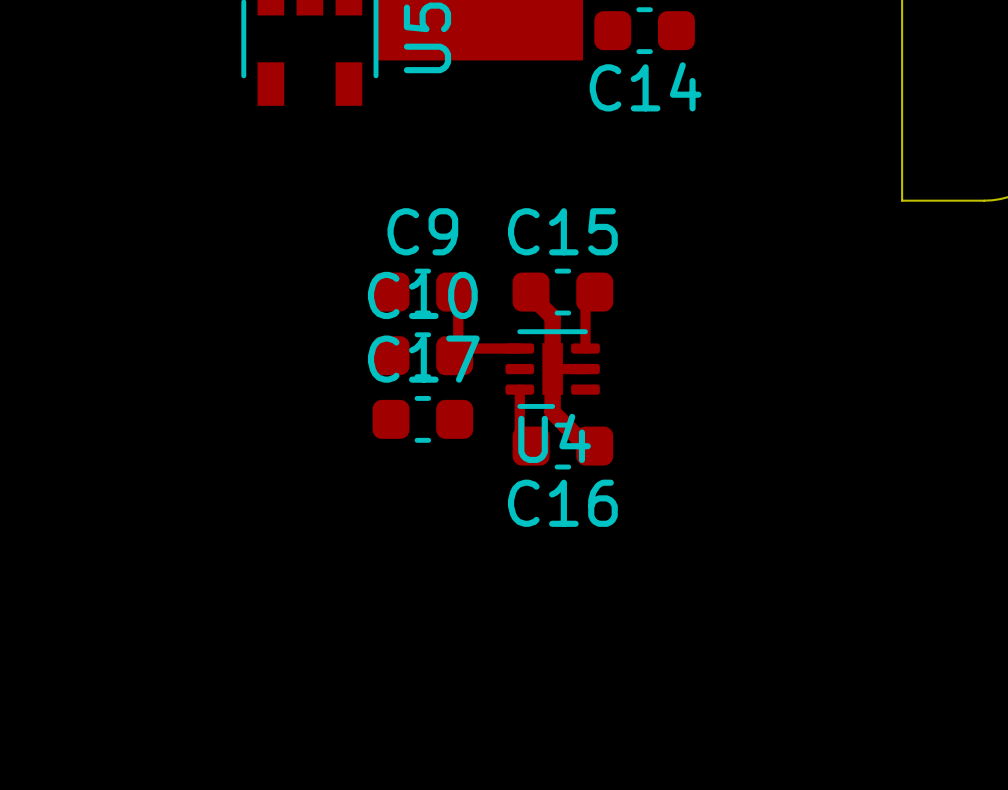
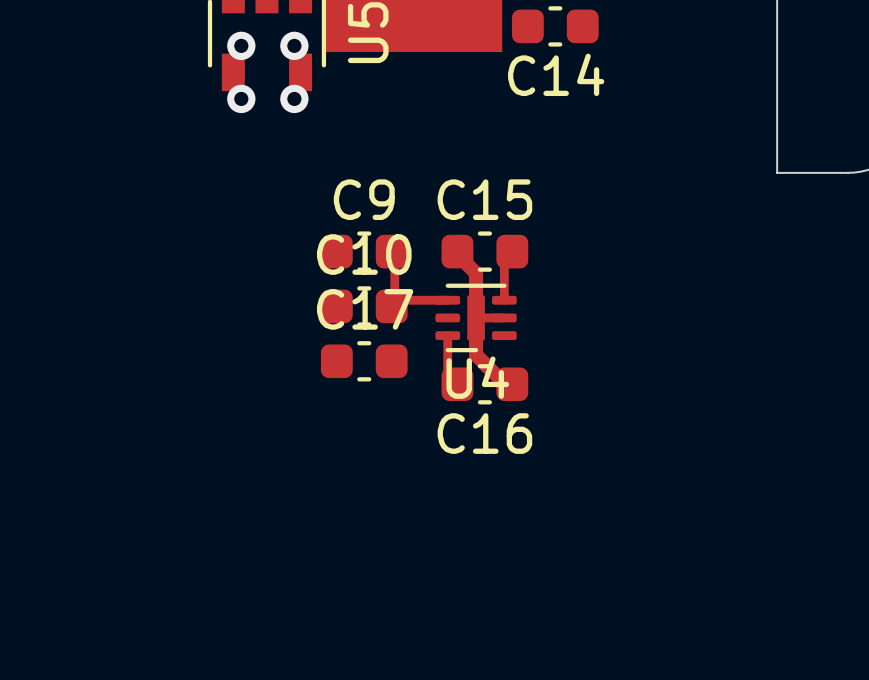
via: none -> (241, 45)
via: none -> (294, 45)
via: none -> (241, 98)
via: none -> (294, 98)

